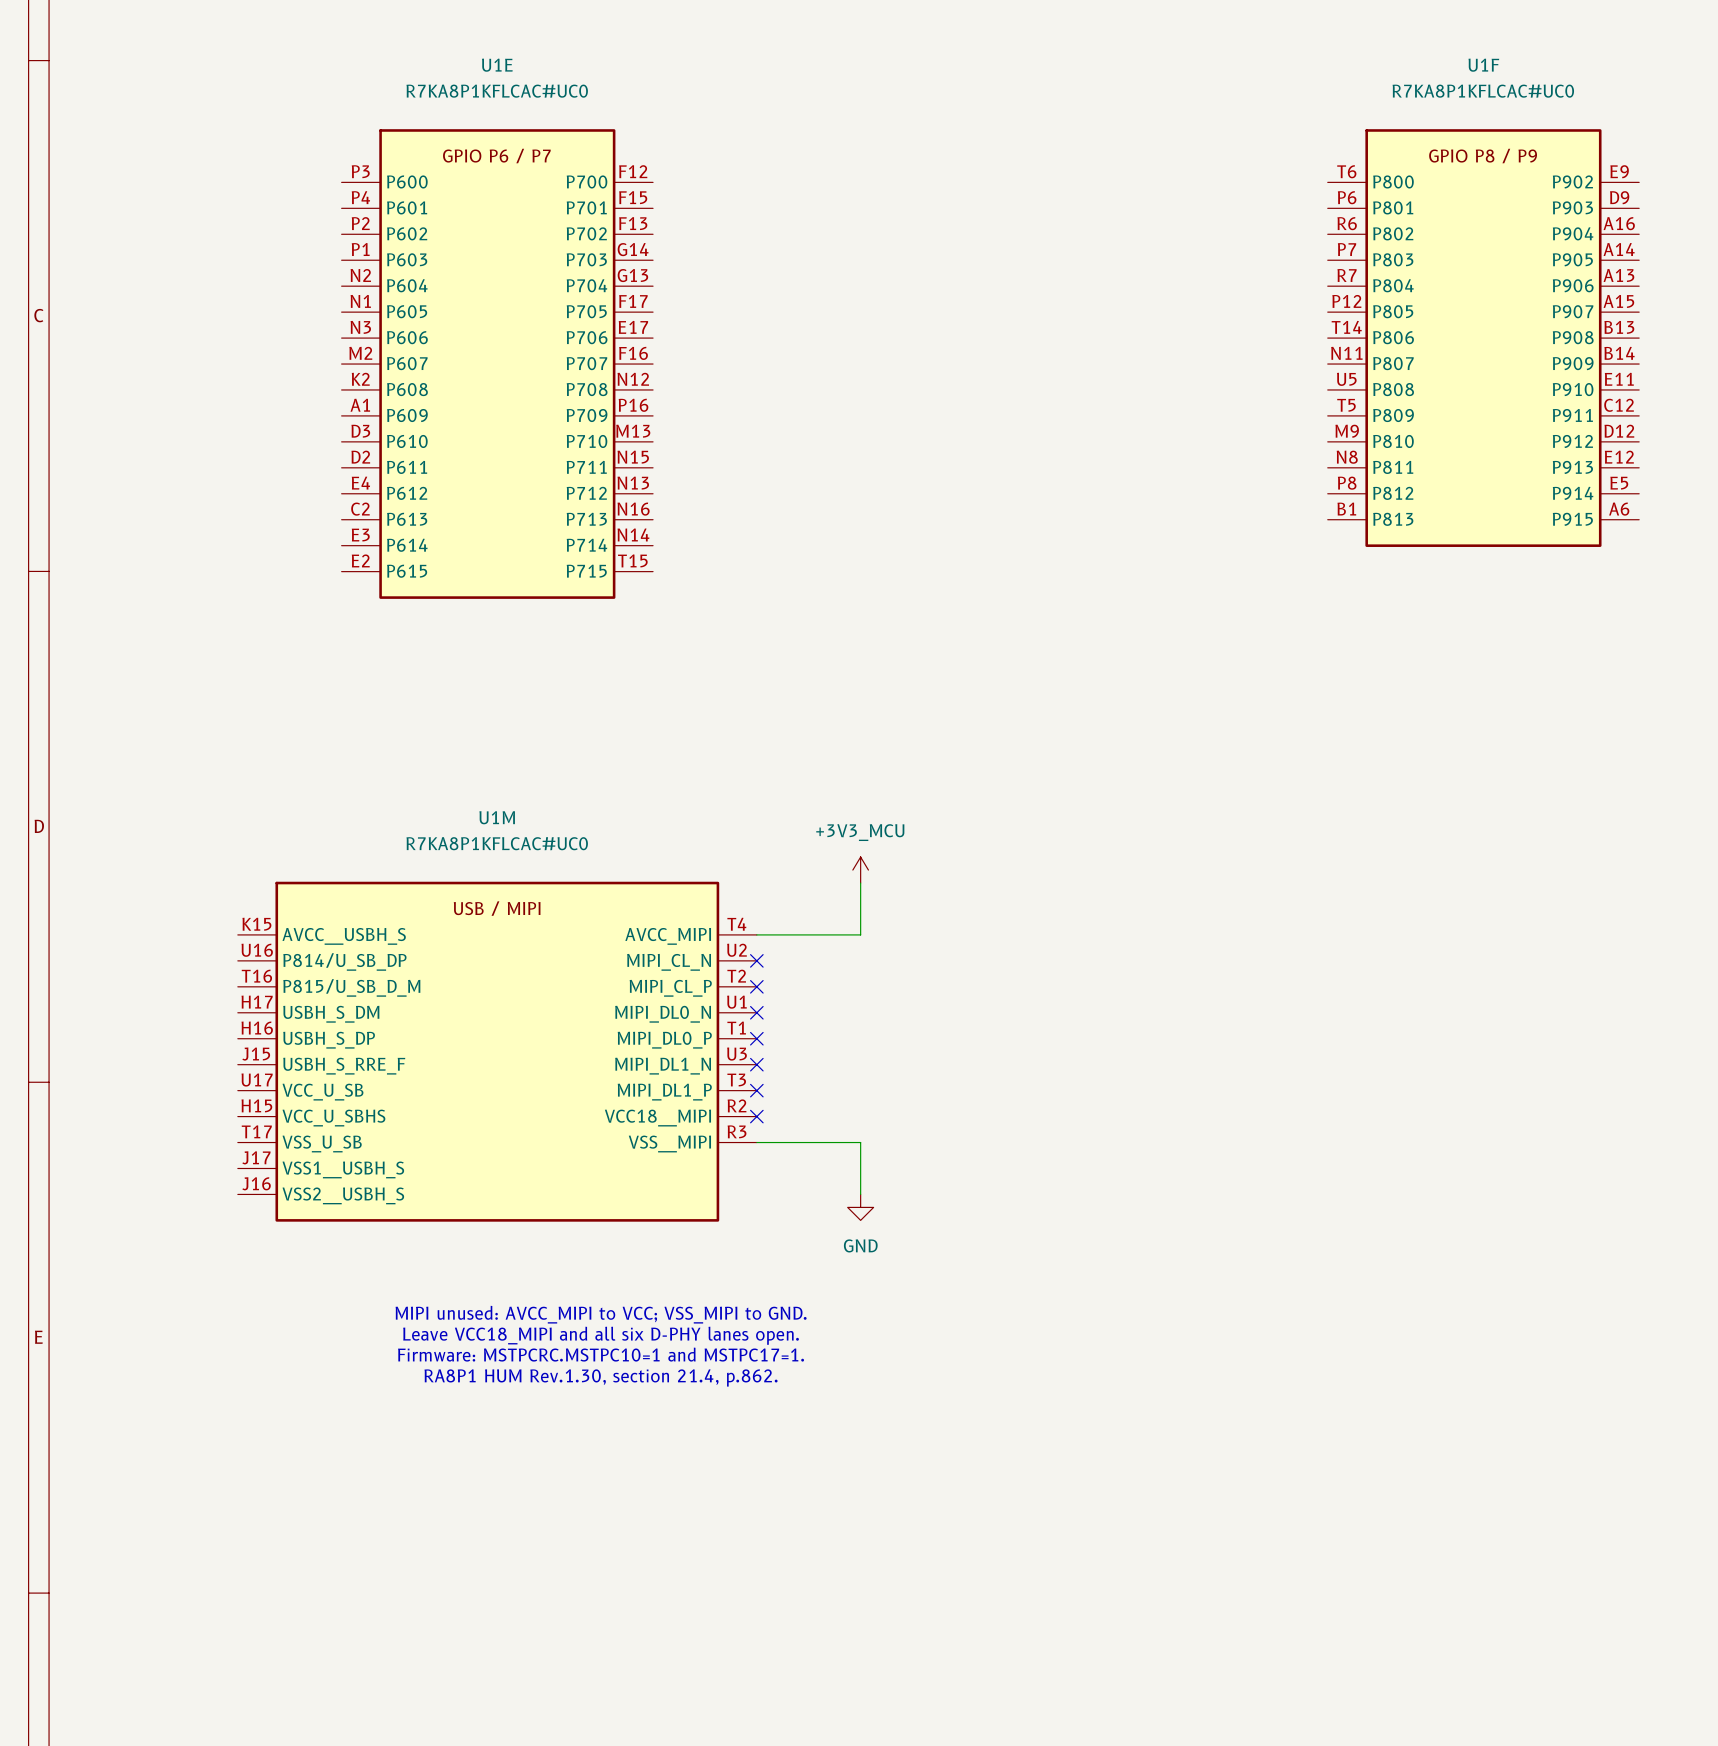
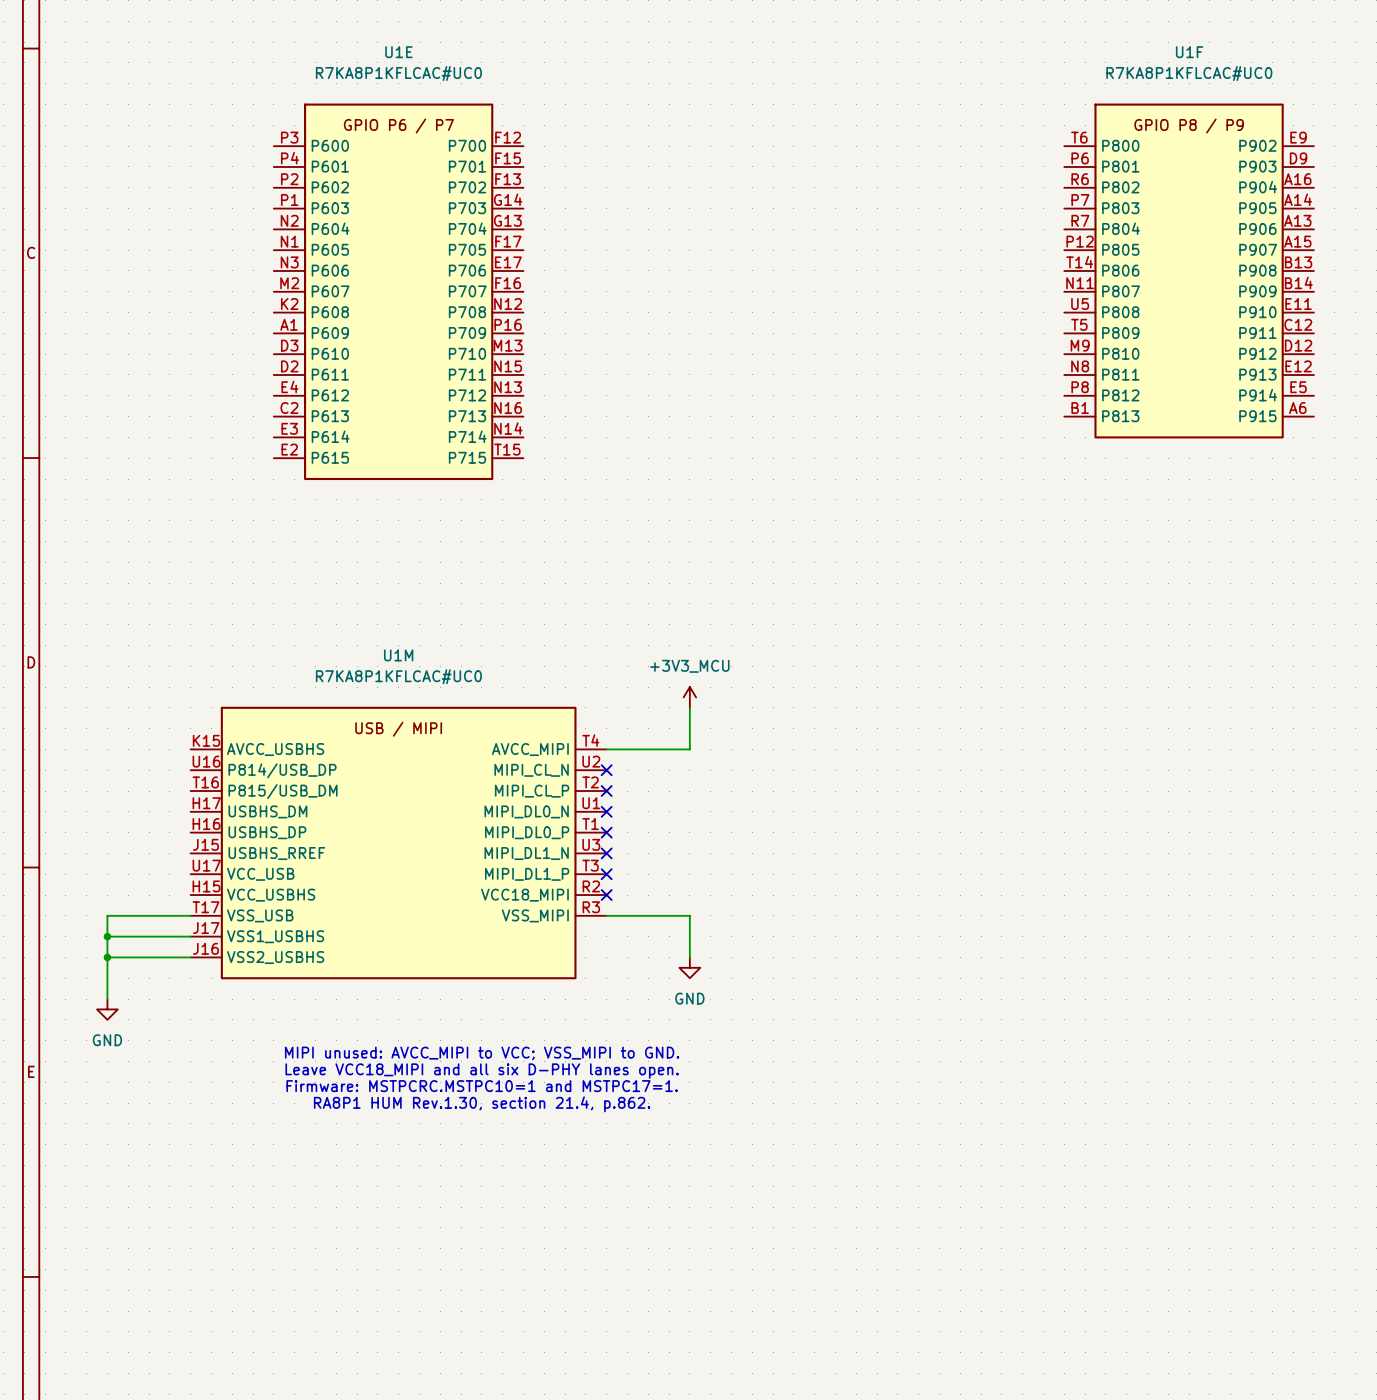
U1M symbol: [237, 881, 757, 1222] -> [190, 706, 607, 980]
wire: none -> (190, 915) (107, 915) (107, 999)
wire: none -> (107, 936) (190, 936)
junction: none -> (107, 936)
wire: none -> (107, 957) (190, 957)
junction: none -> (107, 957)
power symbol: none -> GND (107, 1009)

